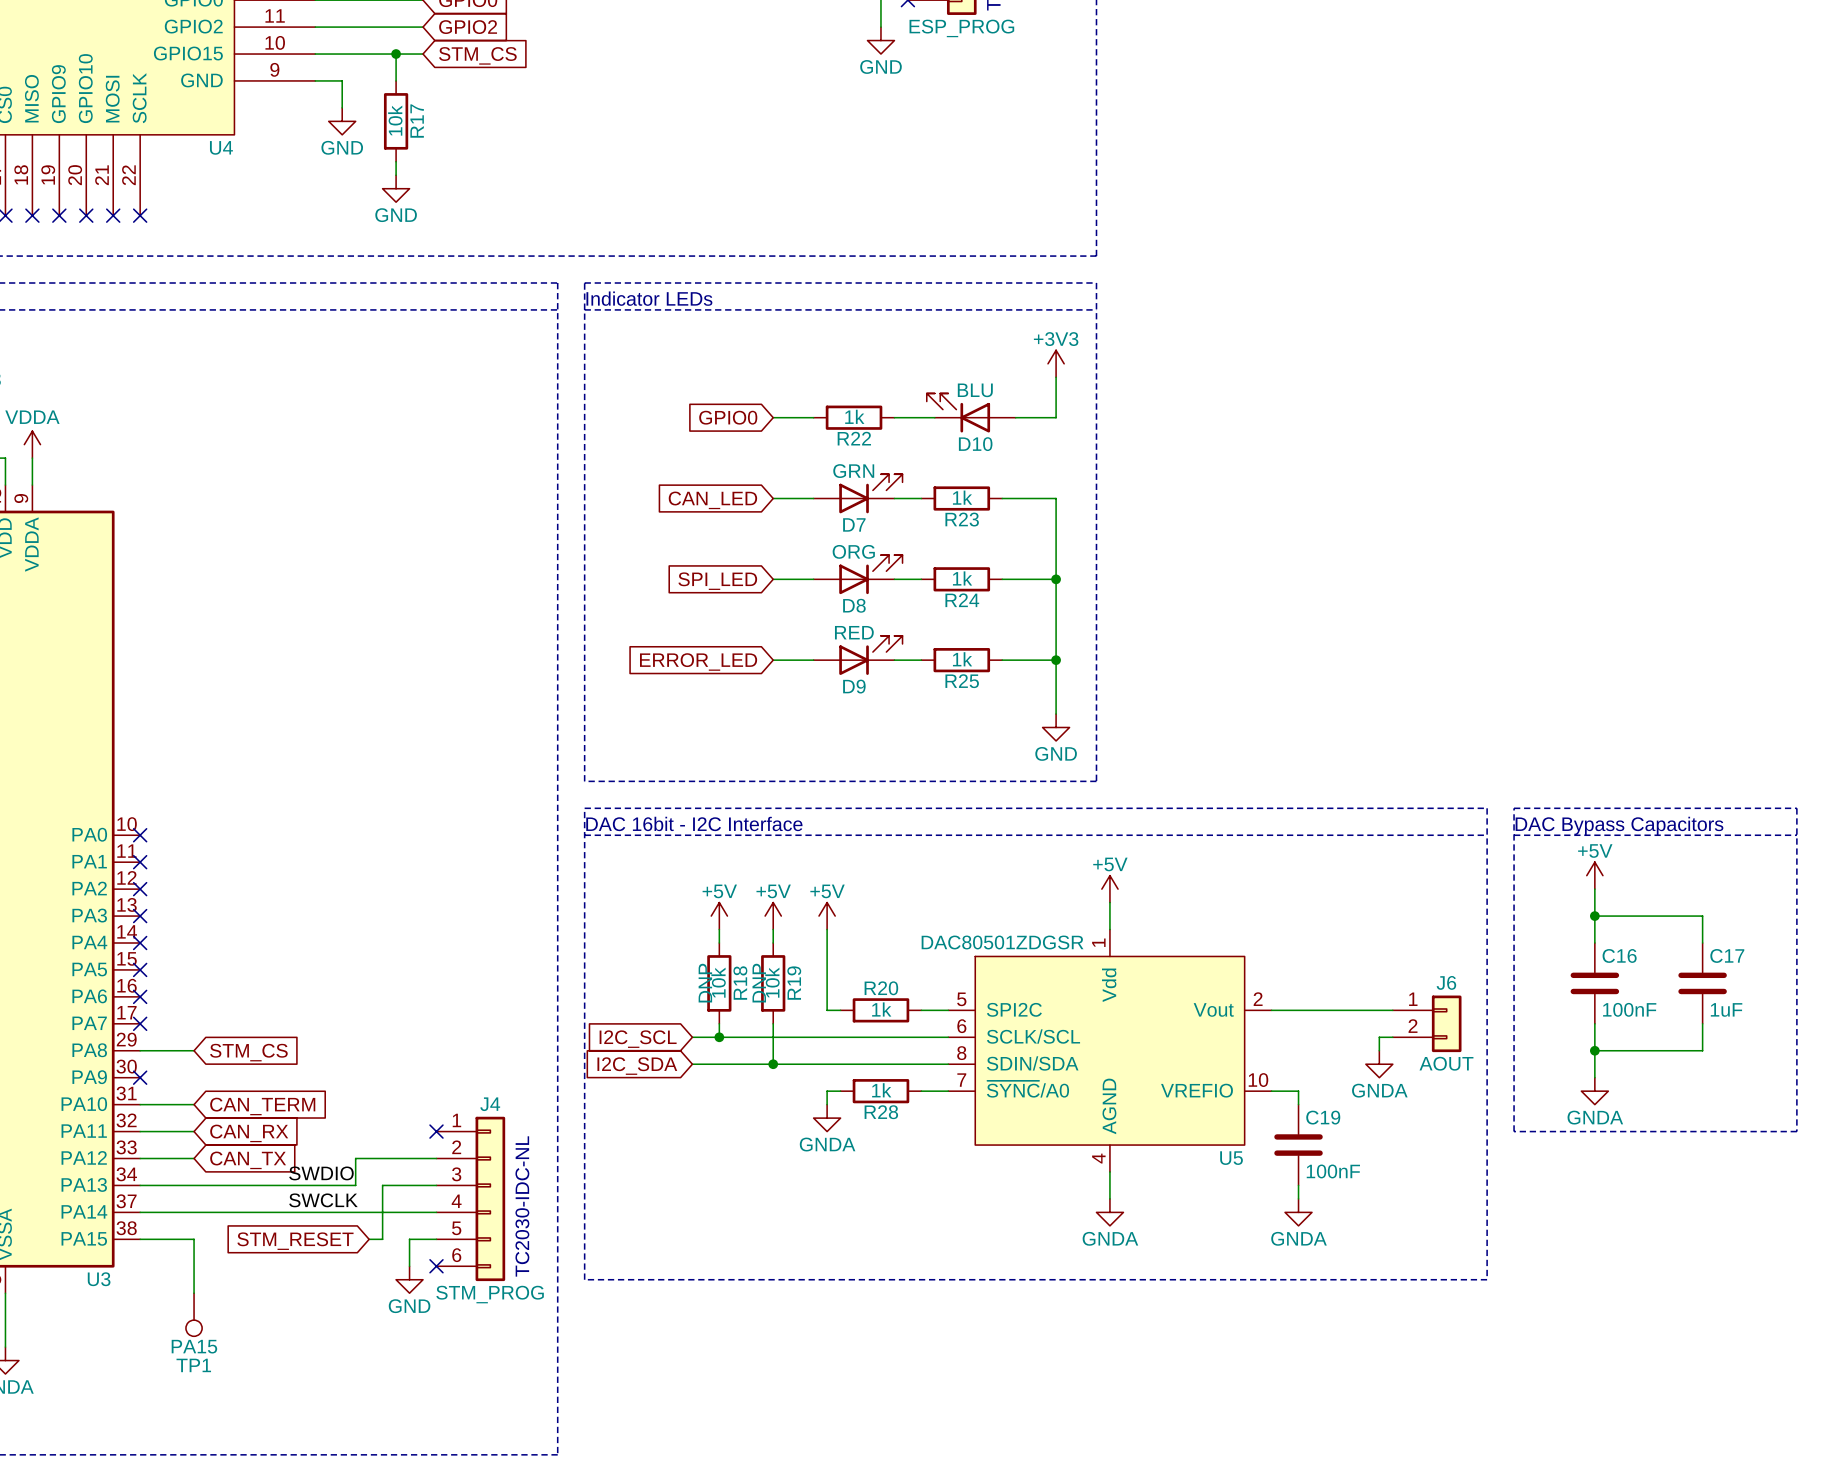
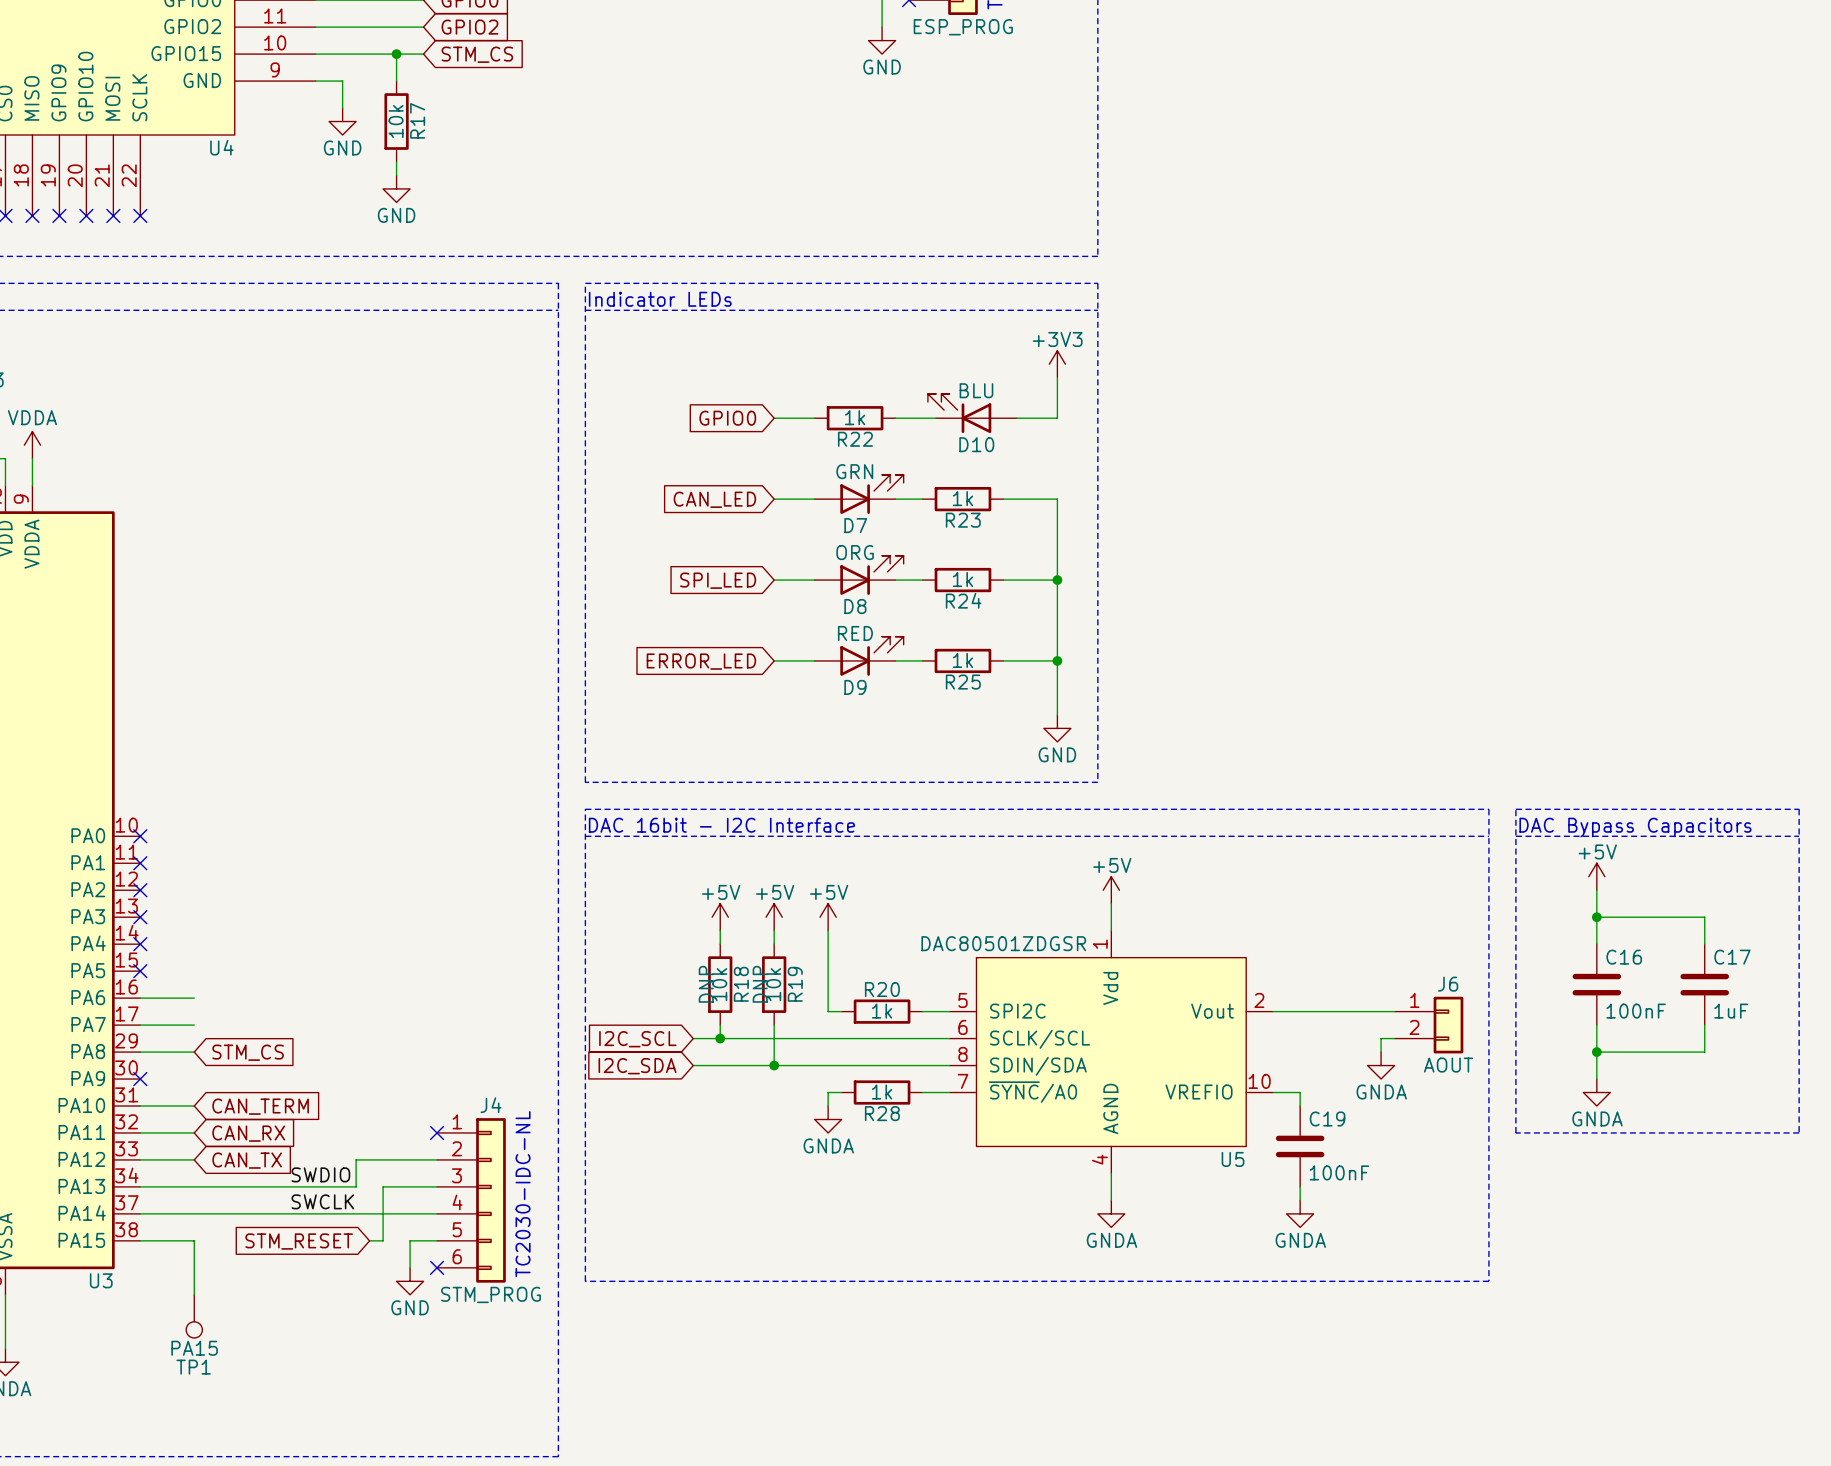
wire: none -> (140, 998) (194, 998)
no-connect mark: (140, 996) -> none
wire: none -> (140, 1025) (194, 1025)
no-connect mark: (140, 1023) -> none

